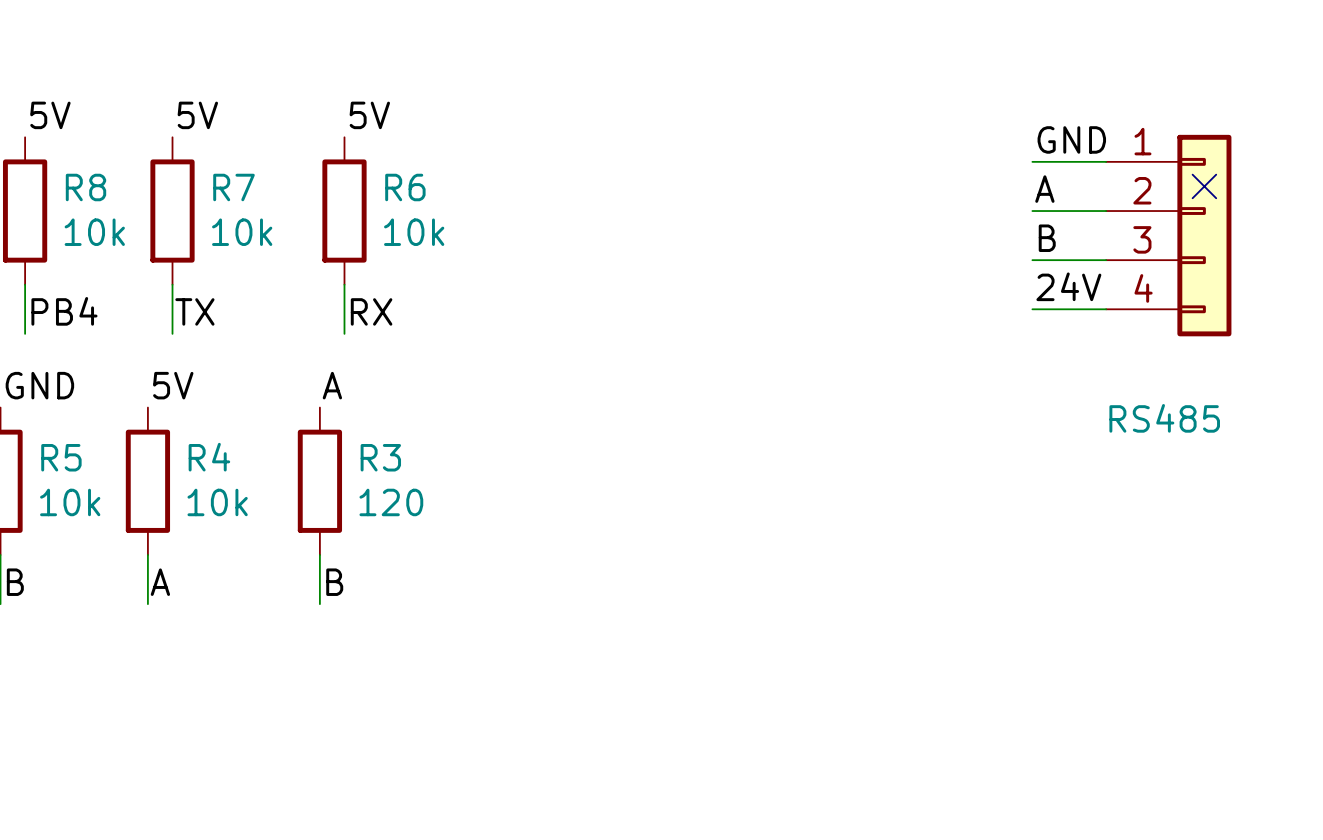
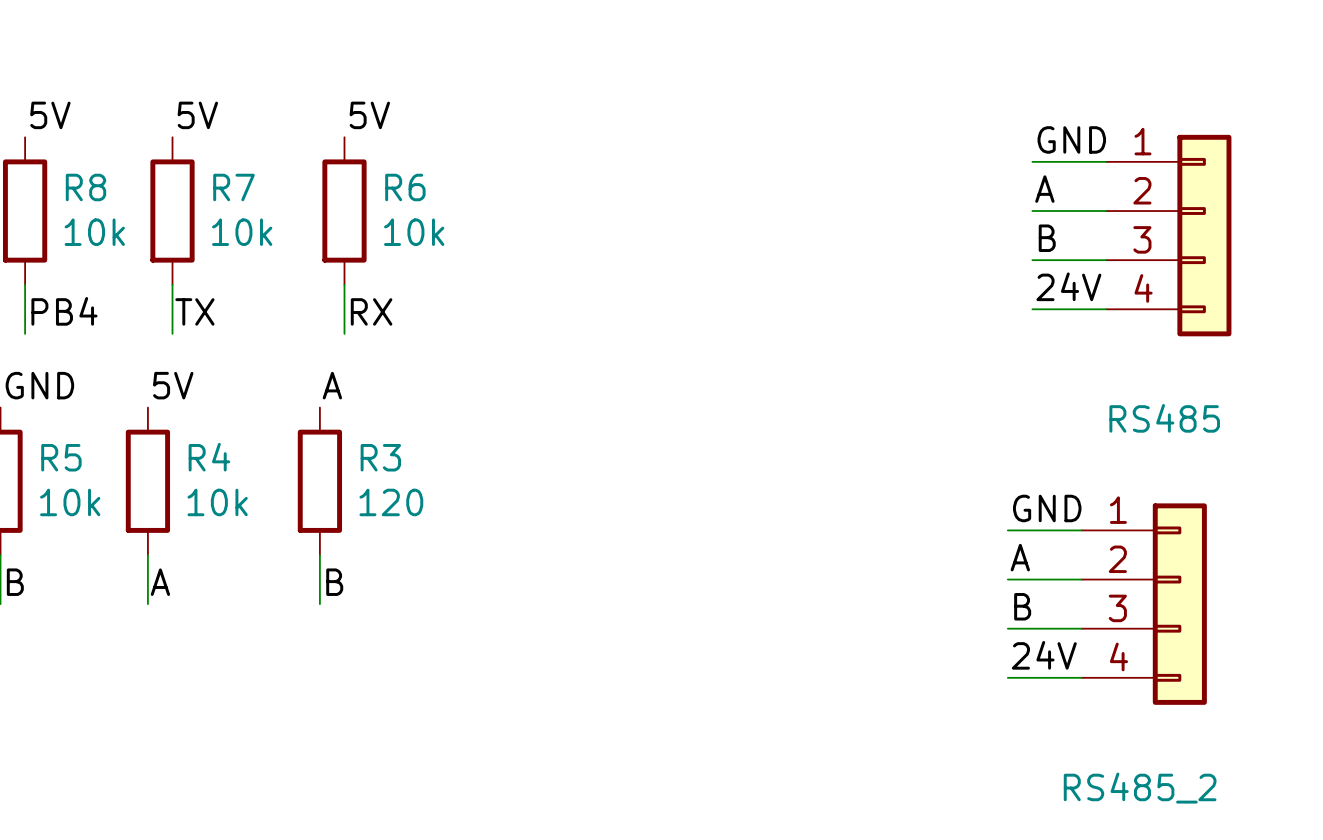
no-connect mark: (1204, 186) -> none
label: none -> GND (1047, 508)
wire: none -> (1007, 530) (1081, 530)
label: none -> A (1020, 557)
wire: none -> (1007, 579) (1081, 579)
RS485_2: none -> (1144, 604)
label: none -> B (1022, 606)
wire: none -> (1007, 628) (1081, 628)
label: none -> 24V (1044, 655)
wire: none -> (1007, 677) (1081, 677)

